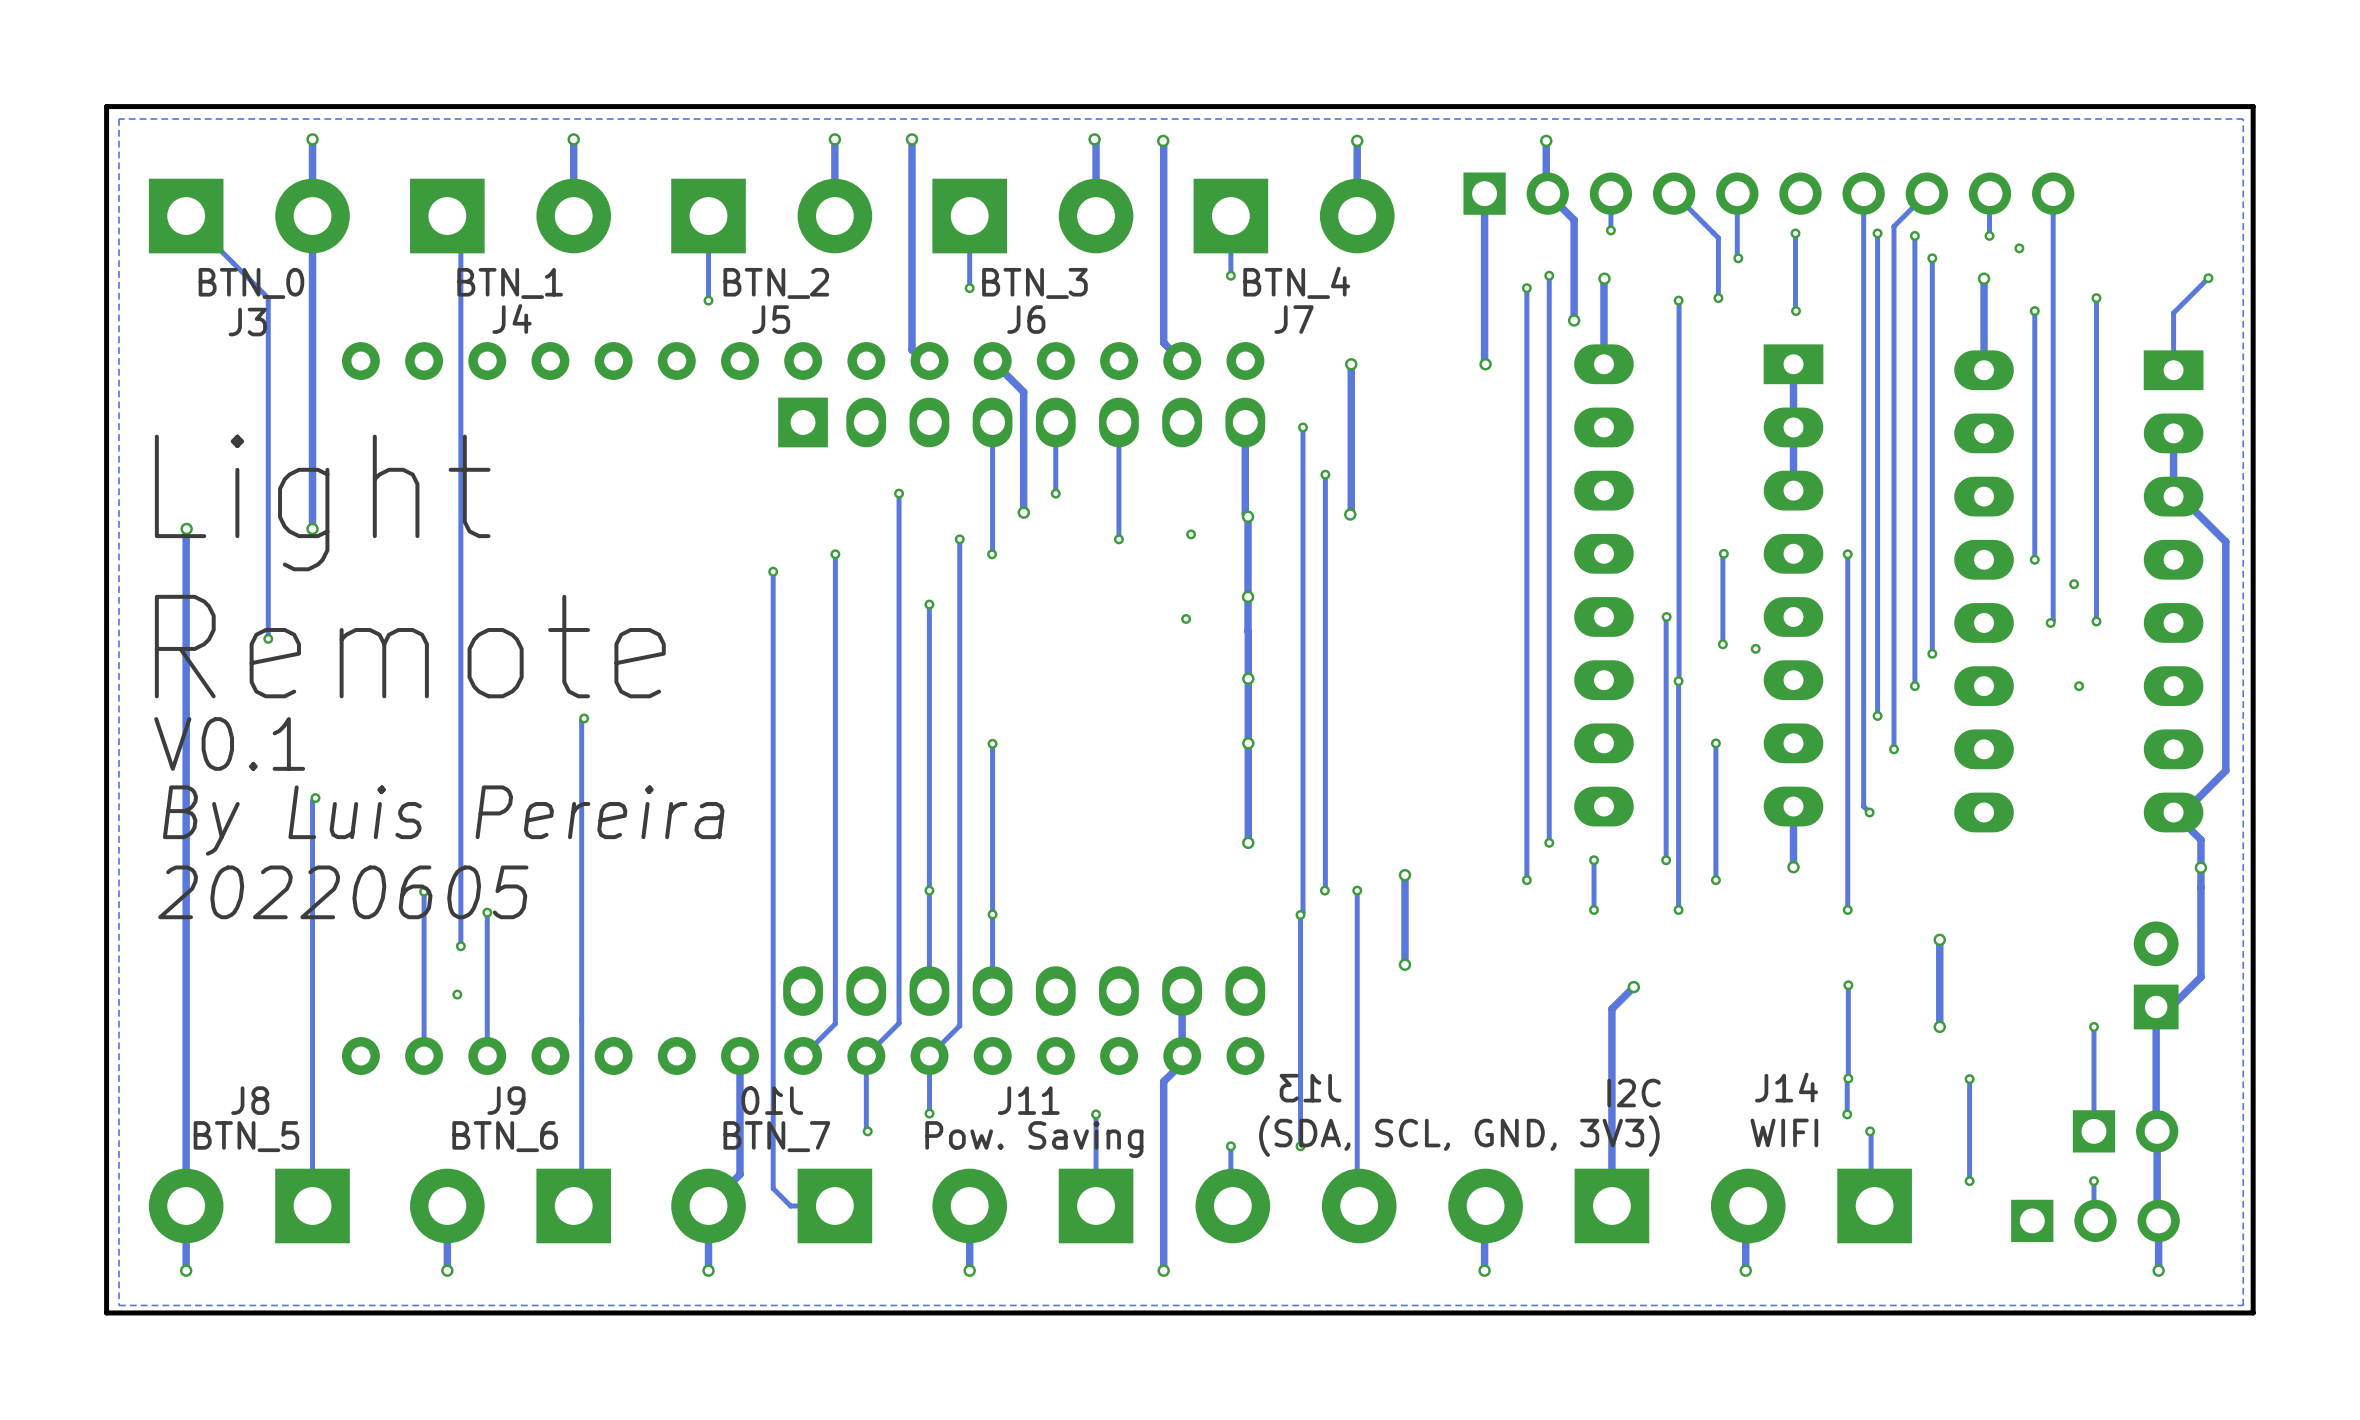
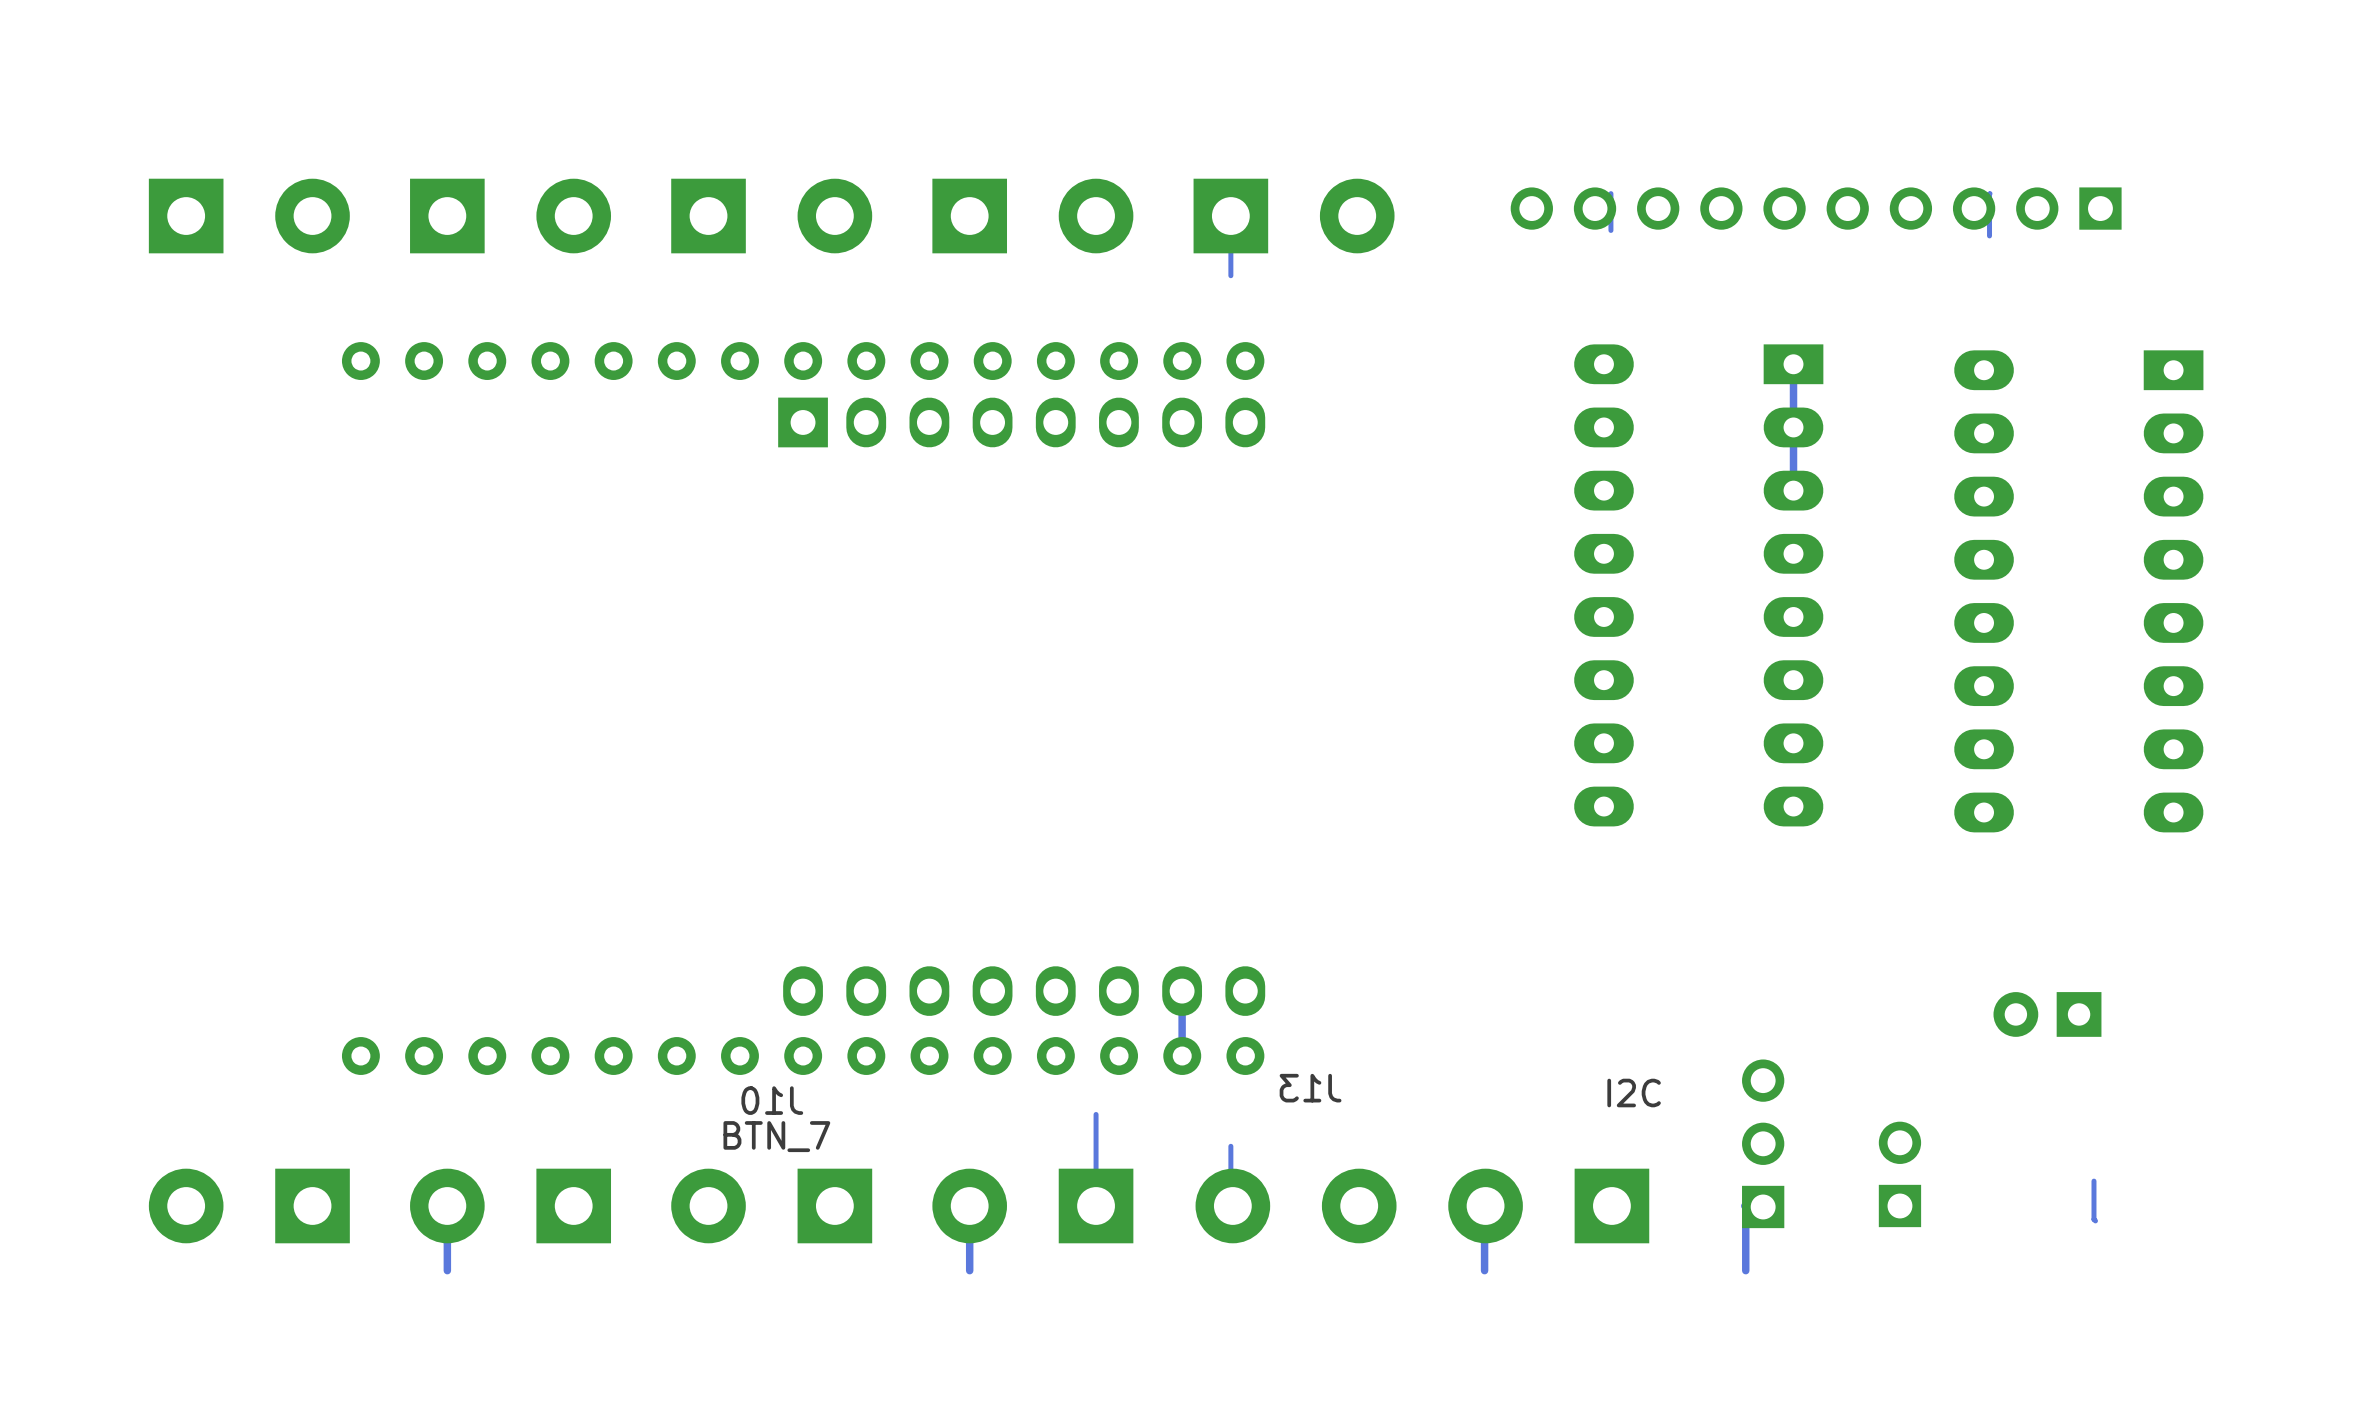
board edge: (2253, 106) (106, 106) (106, 1312) (2253, 1312) (2253, 106) -> none
zone outline: (2243, 119) (2243, 1305) (119, 1305) (119, 119) (2243, 119) -> none
track: (312, 139) (312, 528) -> none
via: (312, 139) -> none
track: (573, 139) (573, 216) -> none
via: (573, 139) -> none
track: (834, 139) (834, 216) -> none
via: (834, 139) -> none
track: (911, 139) (911, 349) (923, 361) (929, 361) -> none
via: (911, 139) -> none
track: (1094, 139) (1096, 216) -> none
via: (1094, 139) -> none
track: (1163, 140) (1163, 342) (1181, 361) -> none
via: (1163, 140) -> none
track: (1357, 140) (1357, 216) -> none
via: (1357, 140) -> none
track: (1546, 140) (1546, 192) (1574, 220) (1574, 320) -> none
via: (1546, 140) -> none
track: (1484, 193) (1485, 364) -> none
track: (1674, 193) (1718, 237) (1718, 298) -> none
track: (1737, 193) (1738, 258) -> none
part rotation: 0° (1768, 193) -> 180° (1816, 208)
track: (1863, 193) (1863, 806) (1869, 812) -> none
track: (1926, 193) (1894, 226) (1894, 749) -> none
track: (2053, 193) (2053, 620) (2050, 622) -> none
track: (186, 216) (268, 298) (268, 638) -> none
track: (447, 216) (460, 229) (460, 946) -> none
track: (708, 216) (708, 300) -> none
track: (969, 216) (969, 288) -> none
via: (1610, 230) -> none
track: (1795, 233) (1795, 311) -> none
via: (1795, 233) -> none
track: (1877, 233) (1877, 715) -> none
via: (1877, 233) -> none
track: (1914, 235) (1914, 686) -> none
via: (1914, 235) -> none
via: (1989, 235) -> none
via: (2019, 248) -> none
via: (1738, 258) -> none
track: (1932, 258) (1932, 653) -> none
via: (1932, 258) -> none
via: (1230, 275) -> none
track: (1549, 275) (1549, 842) -> none
via: (1549, 275) -> none
track: (1604, 278) (1603, 364) -> none
via: (1604, 278) -> none
track: (1984, 278) (1984, 370) -> none
via: (1984, 278) -> none
track: (2208, 278) (2173, 313) (2173, 370) -> none
via: (2208, 278) -> none
text: BTN_4 (1296, 282) -> none
text: BTN_0 (251, 283) -> none
text: BTN_1 (510, 283) -> none
text: BTN_2 (776, 283) -> none
text: BTN_3 (1034, 283) -> none
via: (969, 288) -> none
track: (1526, 288) (1526, 880) -> none
via: (1526, 288) -> none
via: (1718, 298) -> none
track: (2096, 298) (2096, 621) -> none
via: (2096, 298) -> none
via: (708, 300) -> none
track: (1678, 300) (1678, 909) -> none
via: (1678, 300) -> none
via: (1795, 311) -> none
track: (2034, 311) (2034, 559) -> none
via: (2034, 311) -> none
J4 name: J4 (512, 318) -> none
J5 name: J5 (771, 319) -> none
J6 name: J6 (1026, 319) -> none
J7 name: J7 (1294, 319) -> none
via: (1574, 320) -> none
J3 name: J3 (247, 322) -> none
track: (992, 361) (1023, 391) (1023, 512) -> none
track: (1351, 364) (1350, 514) -> none
via: (1351, 364) -> none
via: (1485, 364) -> none
track: (992, 422) (992, 554) -> none
track: (1055, 422) (1055, 493) -> none
track: (1118, 422) (1118, 539) -> none
track: (1245, 422) (1248, 631) -> none
track: (1303, 427) (1303, 912) (1300, 914) (1300, 1146) -> none
via: (1303, 427) -> none
track: (2173, 433) (2173, 496) (2180, 496) (2225, 541) (2225, 770) (2184, 812) (2173, 812) (2200, 839) (2200, 977) (2171, 1007) (2156, 1007) (2158, 1270) -> none
track: (1325, 474) (1324, 890) -> none
via: (1325, 474) -> none
track: (899, 493) (899, 1023) (866, 1056) (867, 1131) -> none
via: (899, 493) -> none
via: (1055, 493) -> none
text: Light (322, 502) -> none
via: (1023, 512) -> none
via: (1350, 514) -> none
via: (1248, 516) -> none
track: (186, 528) (186, 1270) -> none
via: (186, 528) -> none
via: (312, 528) -> none
via: (1191, 534) -> none
track: (959, 539) (959, 1025) (929, 1056) (929, 1113) -> none
via: (959, 539) -> none
via: (1118, 539) -> none
track: (1723, 553) (1722, 644) -> none
via: (1723, 553) -> none
track: (835, 554) (835, 1023) (803, 1056) -> none
via: (835, 554) -> none
via: (992, 554) -> none
track: (1847, 554) (1847, 909) -> none
via: (1847, 554) -> none
via: (2034, 559) -> none
track: (773, 571) (773, 1188) (790, 1205) (834, 1205) -> none
via: (773, 571) -> none
via: (2074, 584) -> none
via: (1248, 596) -> none
track: (929, 604) (929, 991) -> none
via: (929, 604) -> none
track: (1666, 616) (1666, 860) -> none
via: (1666, 616) -> none
via: (1186, 618) -> none
via: (2096, 621) -> none
via: (2050, 622) -> none
track: (1248, 631) (1248, 842) -> none
via: (268, 638) -> none
via: (1722, 644) -> none
text: Remote (410, 646) -> none
via: (1755, 648) -> none
via: (1932, 653) -> none
via: (1248, 678) -> none
via: (1678, 681) -> none
via: (1914, 686) -> none
via: (2079, 686) -> none
via: (1877, 715) -> none
track: (584, 718) (581, 720) (581, 1198) (577, 1202) -> none
via: (584, 718) -> none
text: V0.1 (229, 743) -> none
track: (992, 743) (992, 991) -> none
via: (992, 743) -> none
via: (1248, 743) -> none
track: (1715, 743) (1715, 880) -> none
via: (1715, 743) -> none
via: (1894, 749) -> none
track: (315, 798) (312, 801) (312, 1205) -> none
via: (315, 798) -> none
track: (1793, 806) (1793, 867) -> none
via: (1869, 812) -> none
text: By Luis Pereira (443, 820) -> none
via: (1248, 842) -> none
via: (1549, 842) -> none
track: (1594, 860) (1594, 909) -> none
via: (1594, 860) -> none
via: (1666, 860) -> none
via: (1793, 867) -> none
via: (2200, 867) -> none
track: (1404, 875) (1404, 964) -> none
via: (1404, 875) -> none
via: (1526, 880) -> none
via: (1715, 880) -> none
via: (929, 890) -> none
via: (1324, 890) -> none
track: (1357, 890) (1357, 1205) -> none
via: (1357, 890) -> none
track: (424, 891) (424, 1056) -> none
via: (424, 891) -> none
text: 20220605 (343, 892) -> none
via: (1594, 909) -> none
via: (1678, 909) -> none
via: (1847, 909) -> none
track: (487, 912) (487, 1056) -> none
via: (487, 912) -> none
via: (992, 914) -> none
via: (1300, 914) -> none
track: (1939, 939) (1939, 1026) -> none
via: (1939, 939) -> none
via: (460, 946) -> none
via: (1404, 964) -> none
part rotation: 0° (2156, 975) -> 90° counterclockwise (2047, 1014)
part position: (2156, 975) -> (2047, 1014)
track: (1848, 985) (1847, 1114) -> none
via: (1848, 985) -> none
track: (1633, 987) (1611, 1008) (1611, 1205) (1633, 1182) (1609, 1205) -> none
via: (1633, 987) -> none
via: (457, 994) -> none
via: (1939, 1026) -> none
track: (2093, 1026) (2093, 1131) -> none
via: (2093, 1026) -> none
track: (739, 1056) (739, 1174) (708, 1205) (708, 1270) -> none
track: (1182, 1056) (1182, 1063) (1163, 1081) (1163, 1270) -> none
via: (1848, 1078) -> none
track: (1969, 1079) (1969, 1181) -> none
via: (1969, 1079) -> none
J8 name: J8 (250, 1100) -> none
J9 name: J9 (506, 1100) -> none
J11 name: J11 (1028, 1100) -> none
via: (929, 1113) -> none
via: (1096, 1114) -> none
via: (1847, 1114) -> none
via: (867, 1131) -> none
track: (1870, 1131) (1871, 1205) -> none
via: (1870, 1131) -> none
part rotation: 0° (2125, 1131) -> 90° counterclockwise (1899, 1174)
part position: (2125, 1131) -> (1899, 1174)
text: WIFI (1784, 1132) -> none
text: BTN_5 (246, 1136) -> none
text: BTN_6 (505, 1136) -> none
text: (SDA, SCL, GND, 3V3) (1459, 1136) -> none
text: Pow. Saving (1034, 1139) -> none
via: (1230, 1146) -> none
via: (1300, 1146) -> none
via: (1969, 1181) -> none
via: (2093, 1181) -> none
J14: (1811, 1205) -> none
part rotation: 0° (2095, 1220) -> 90° counterclockwise (1763, 1143)
part position: (2095, 1220) -> (1763, 1143)
via: (186, 1270) -> none
via: (447, 1270) -> none
via: (708, 1270) -> none
via: (969, 1270) -> none
via: (1163, 1270) -> none
via: (1484, 1270) -> none
via: (1745, 1270) -> none
via: (2158, 1270) -> none

